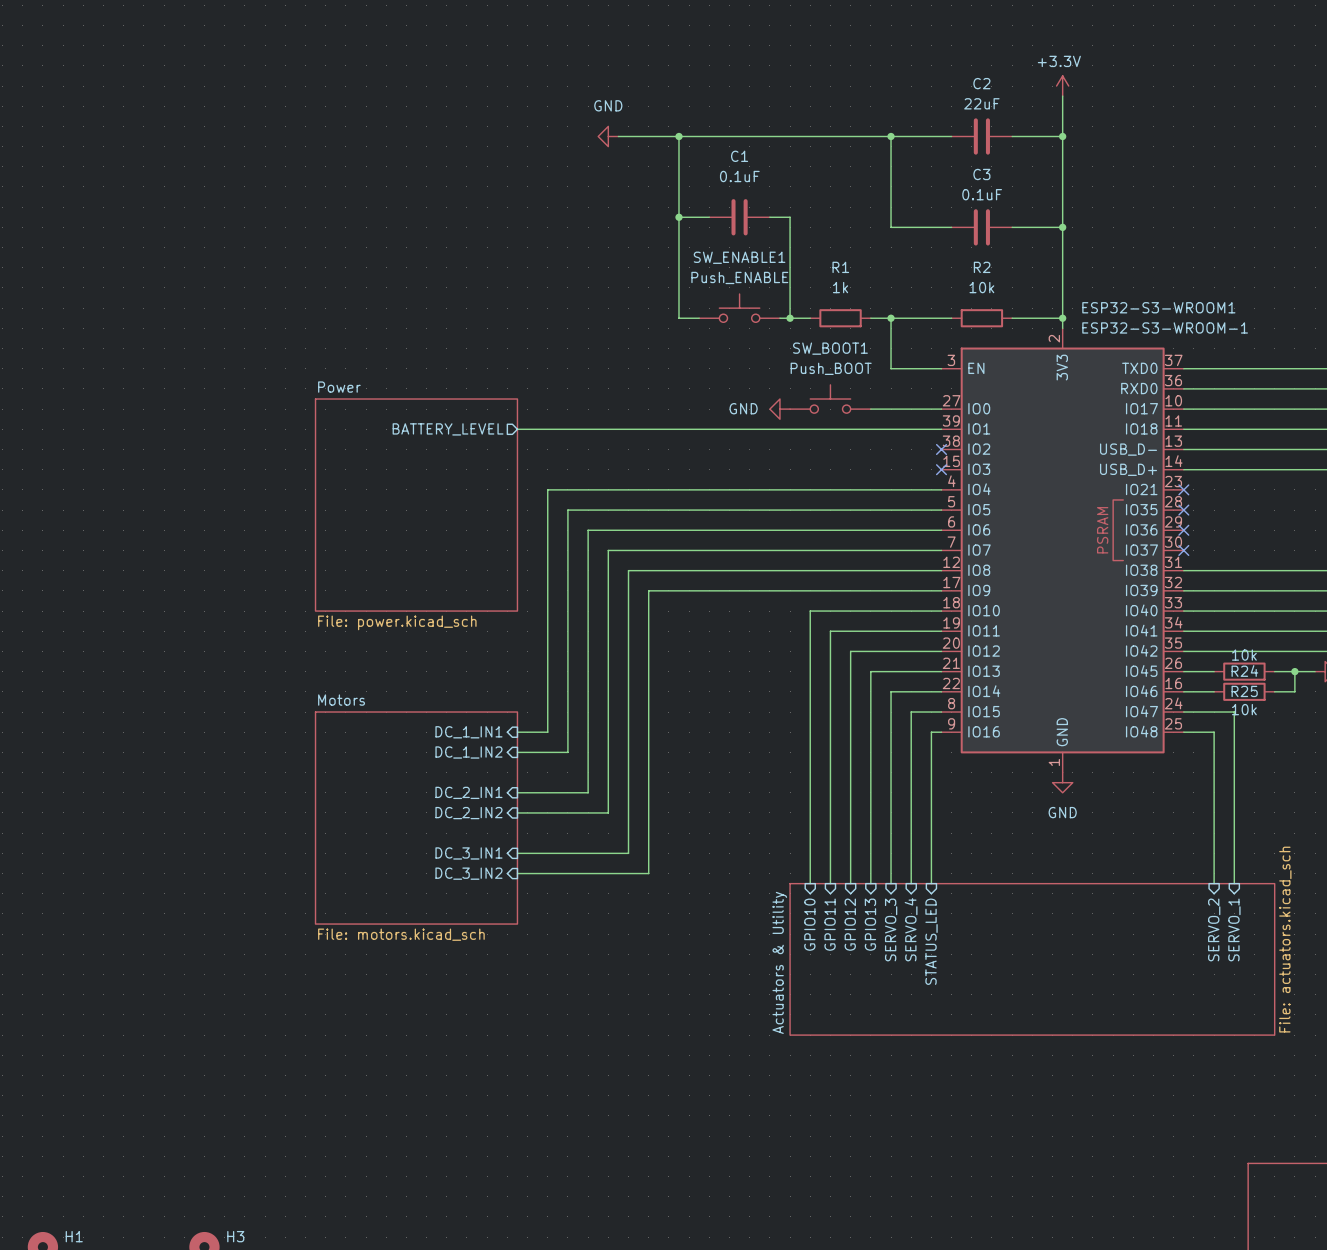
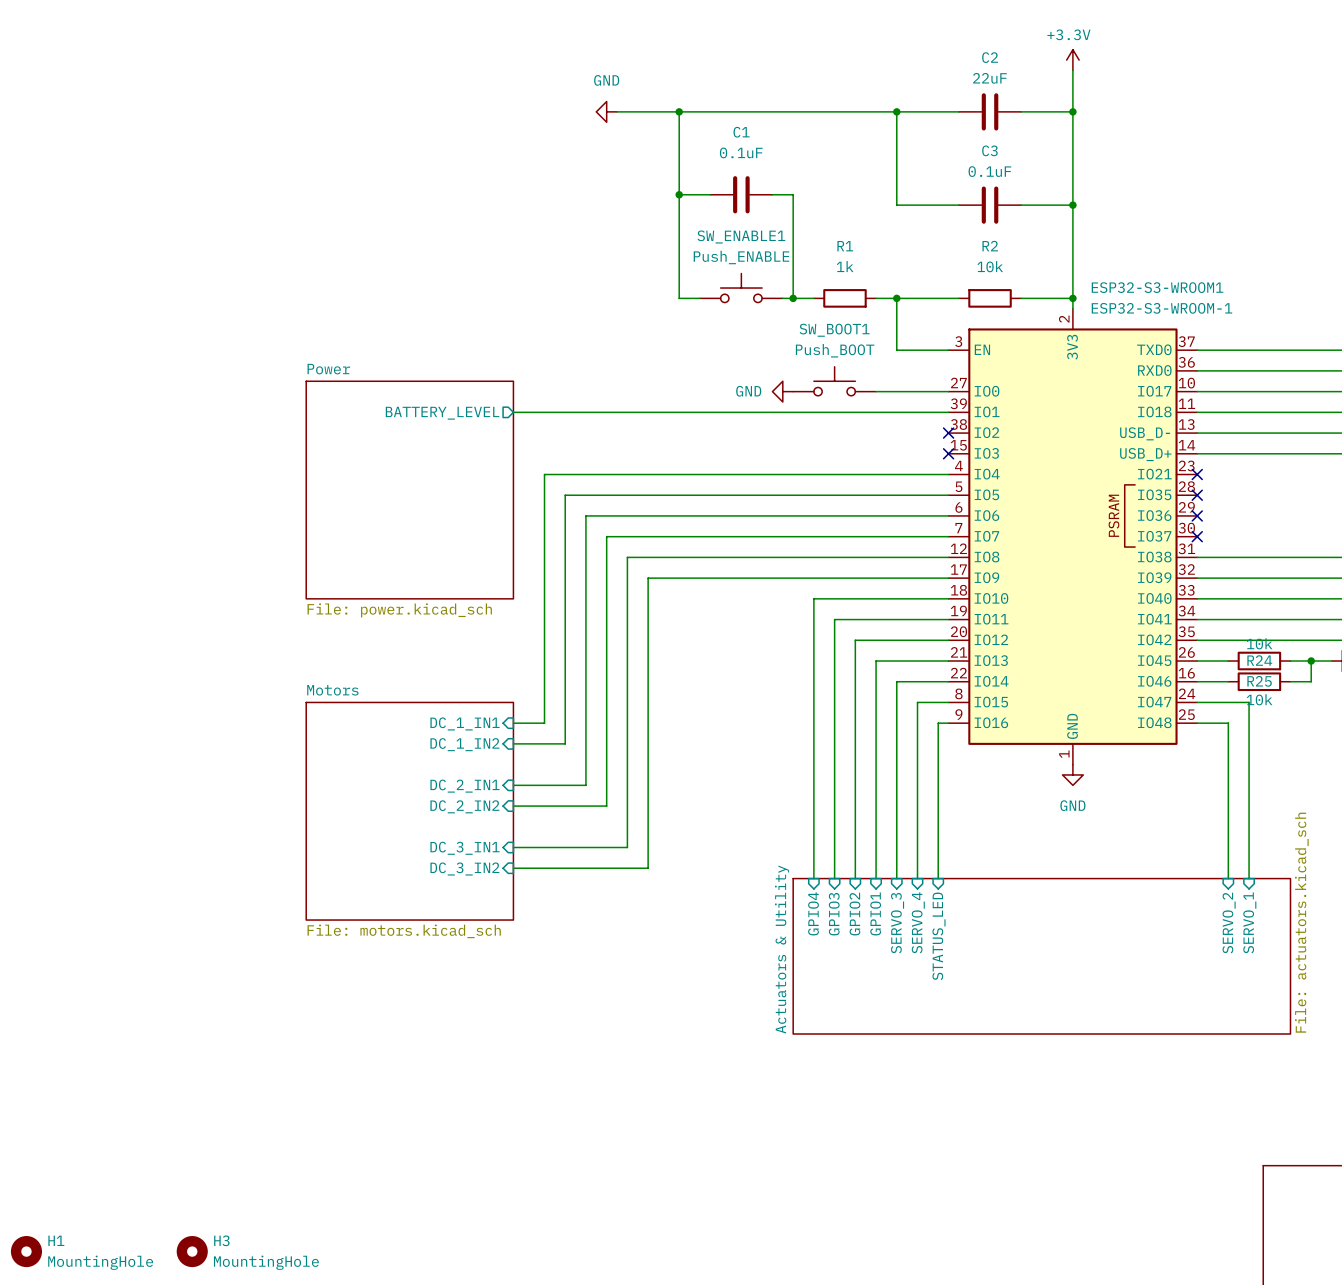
sheet pin: GPIO10 (809, 924) -> GPIO4 (813, 913)
sheet pin: GPIO11 (830, 924) -> GPIO3 (834, 914)
sheet pin: GPIO12 (850, 924) -> GPIO2 (854, 914)
sheet pin: GPIO13 (870, 924) -> GPIO1 (875, 913)

